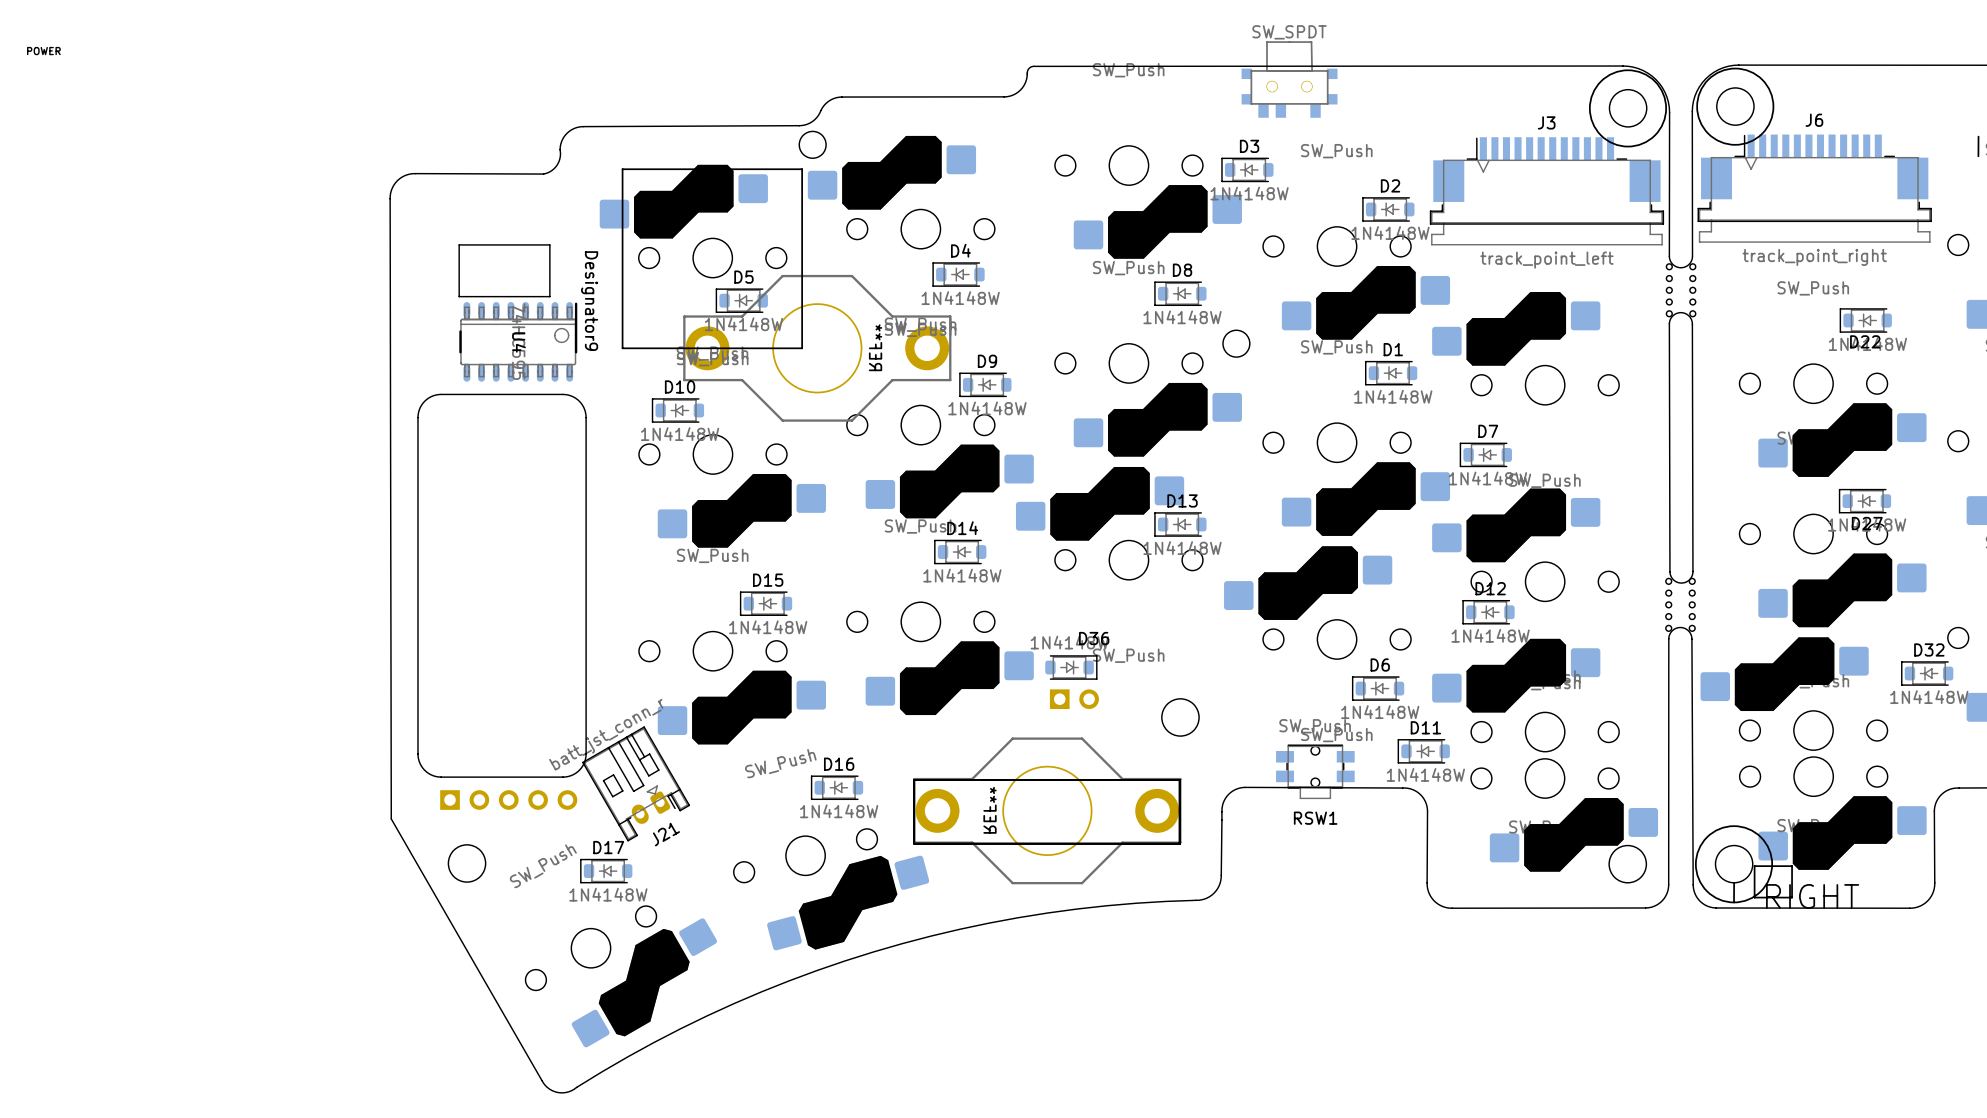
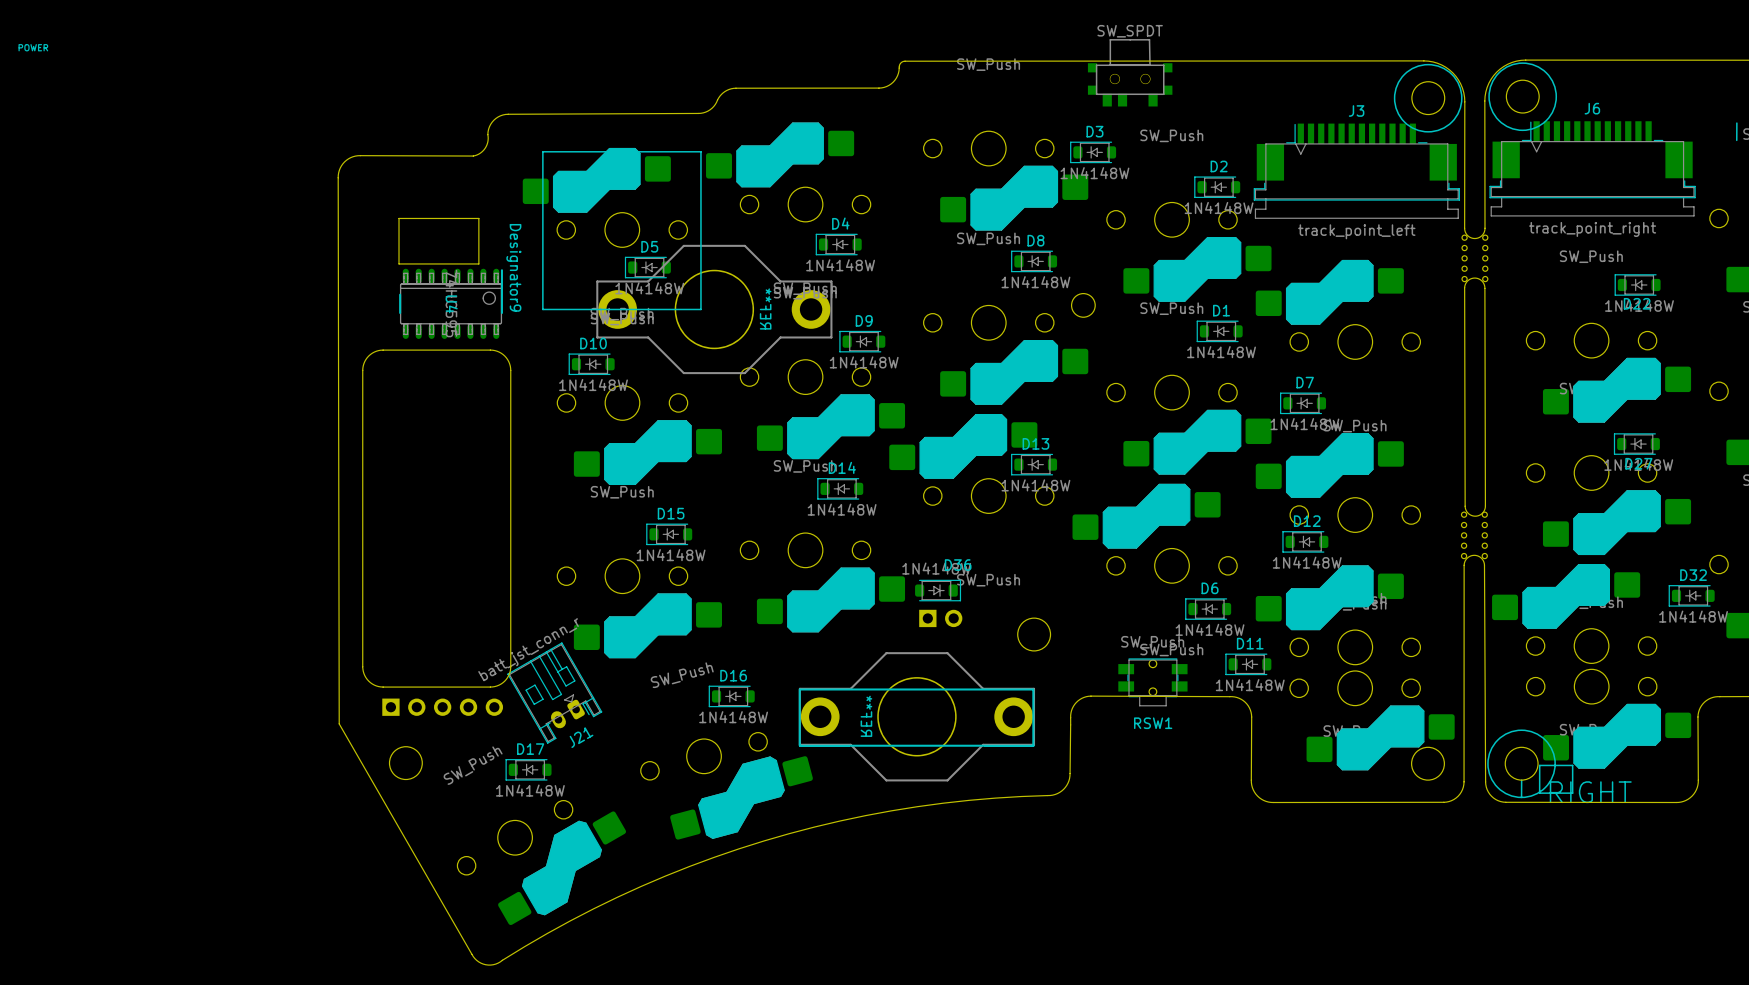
round board edge: [798, 130, 827, 159] -> none

